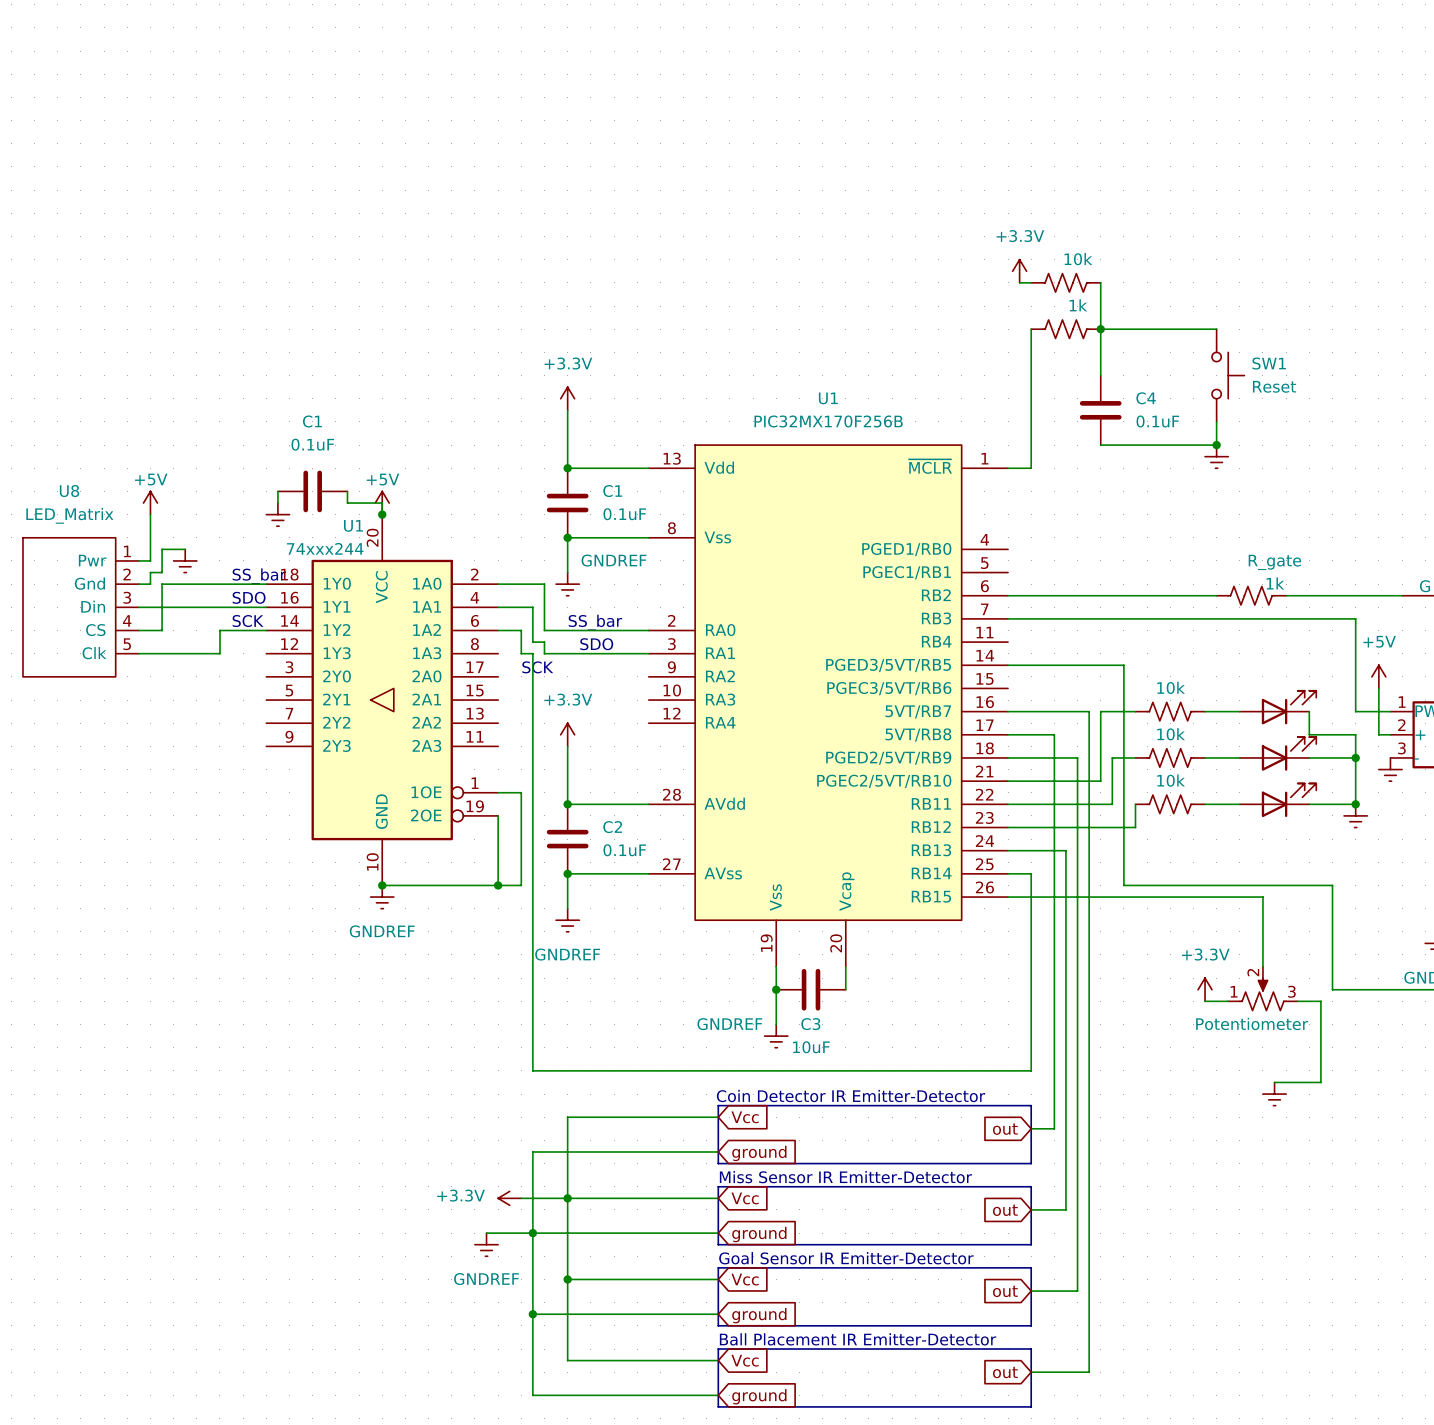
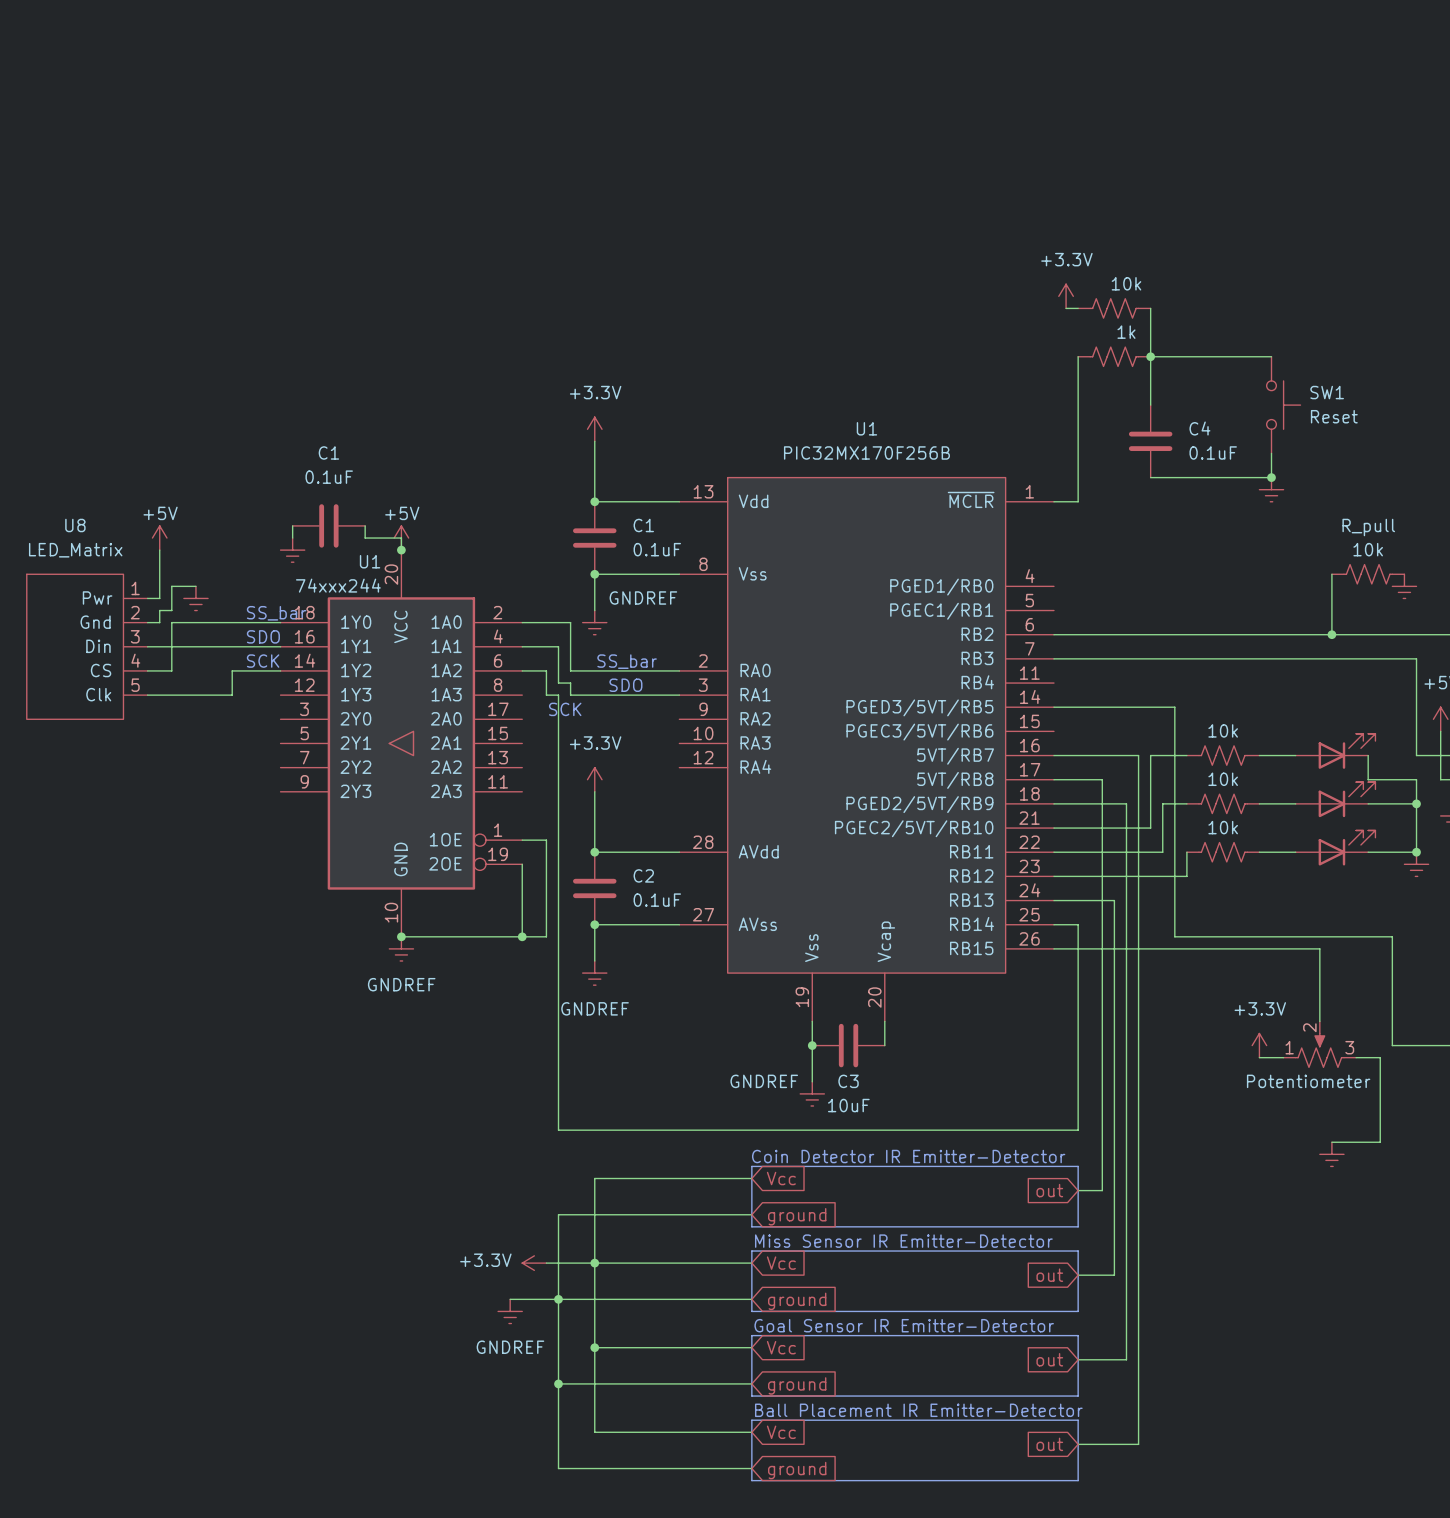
wire: none -> (1331, 574) (1331, 634)
R_pull: none -> 10k (1368, 574)
power symbol: none -> (1404, 586)
R_gate: 1k (1251, 595) -> none
junction: none -> (1331, 634)

